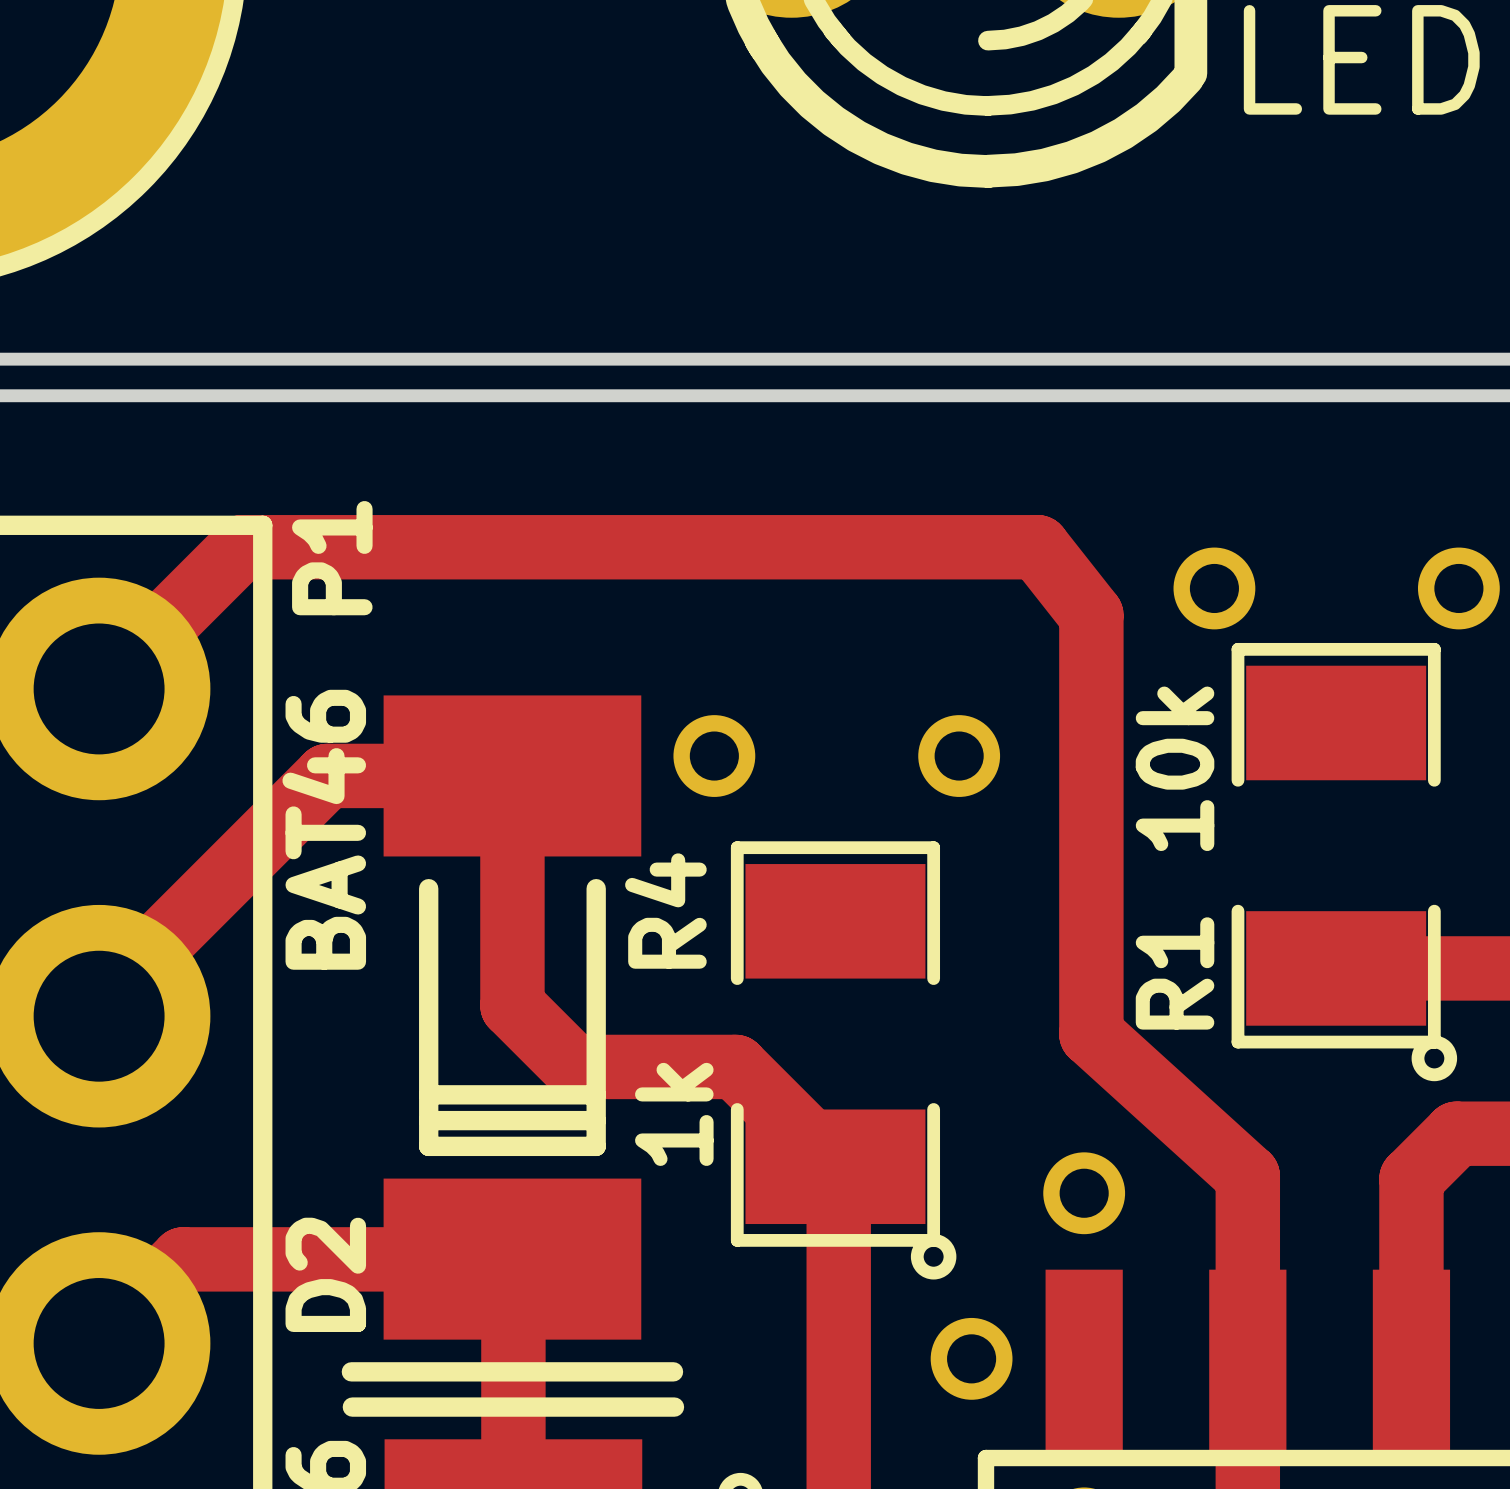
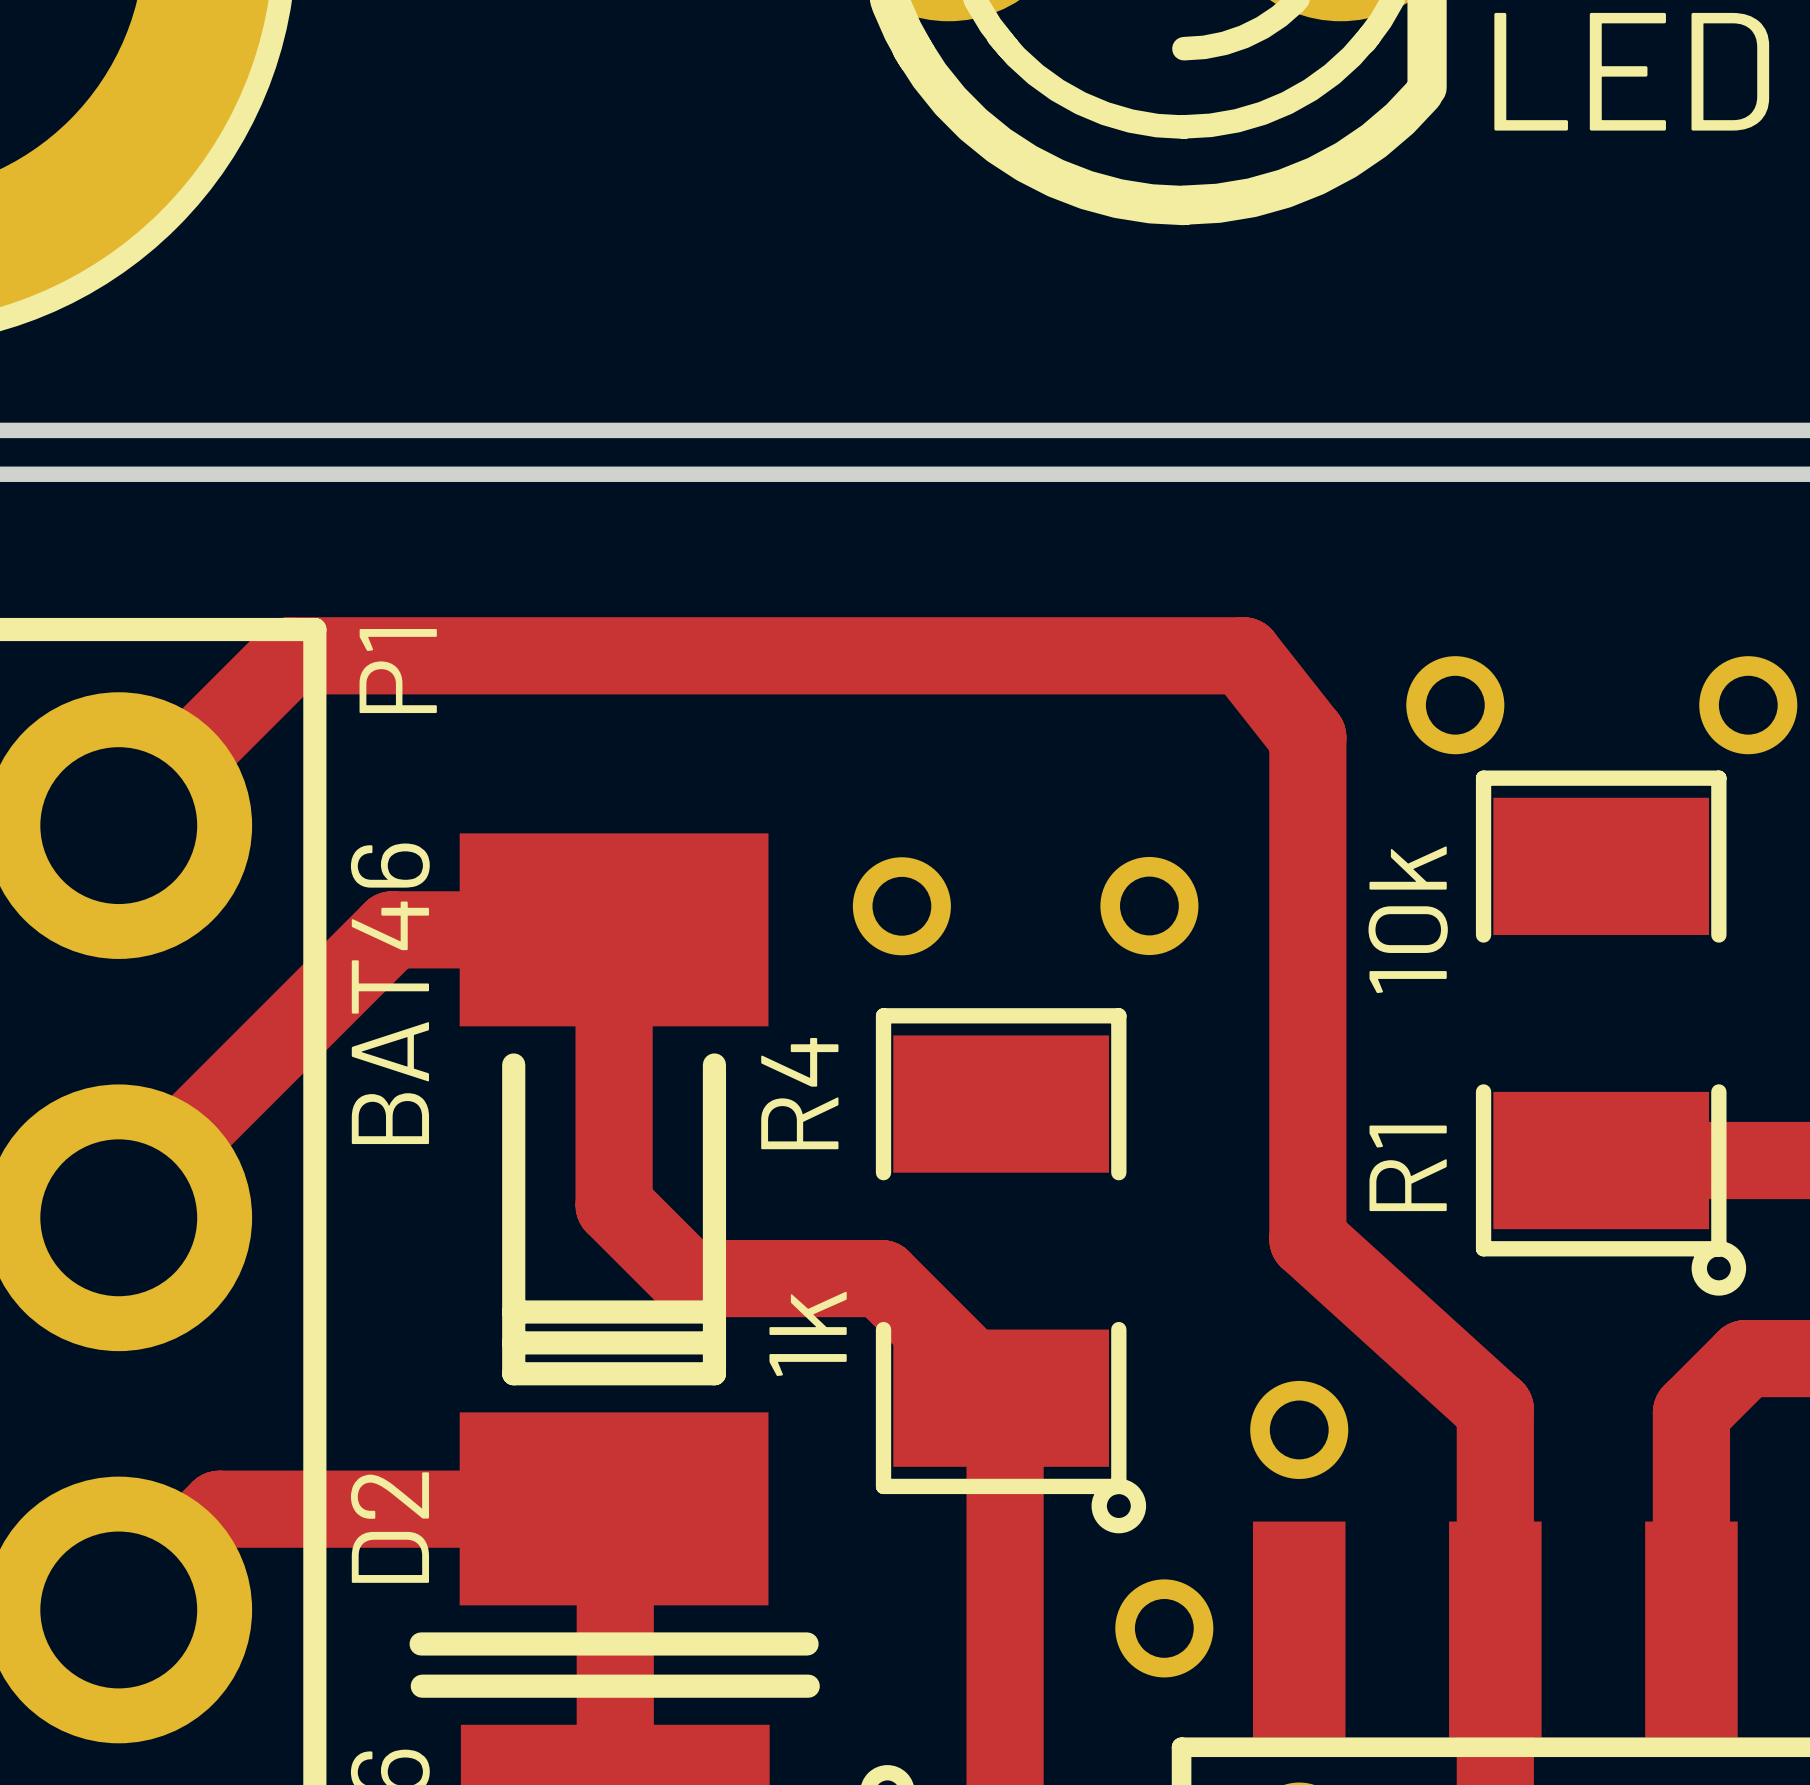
part position: (714, 756) -> (901, 906)

